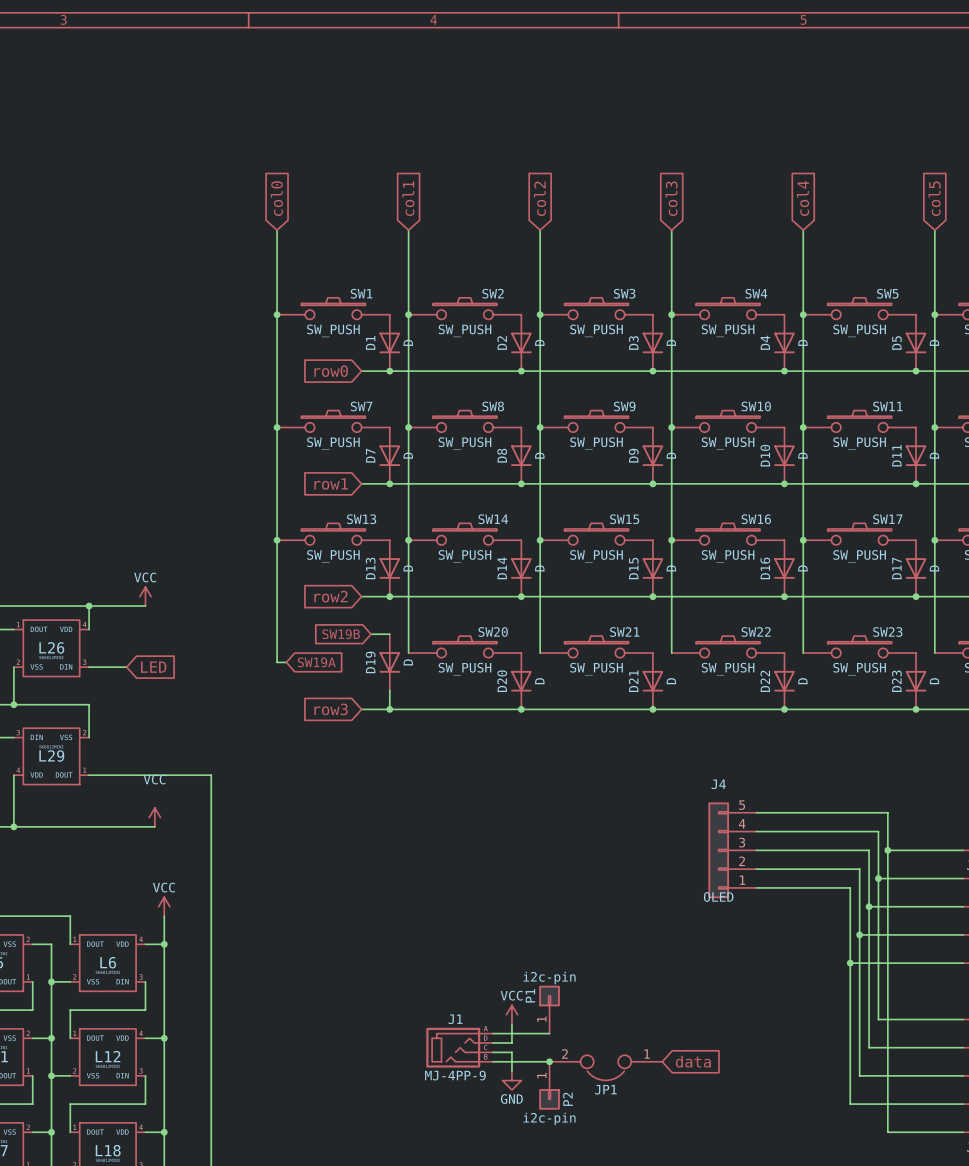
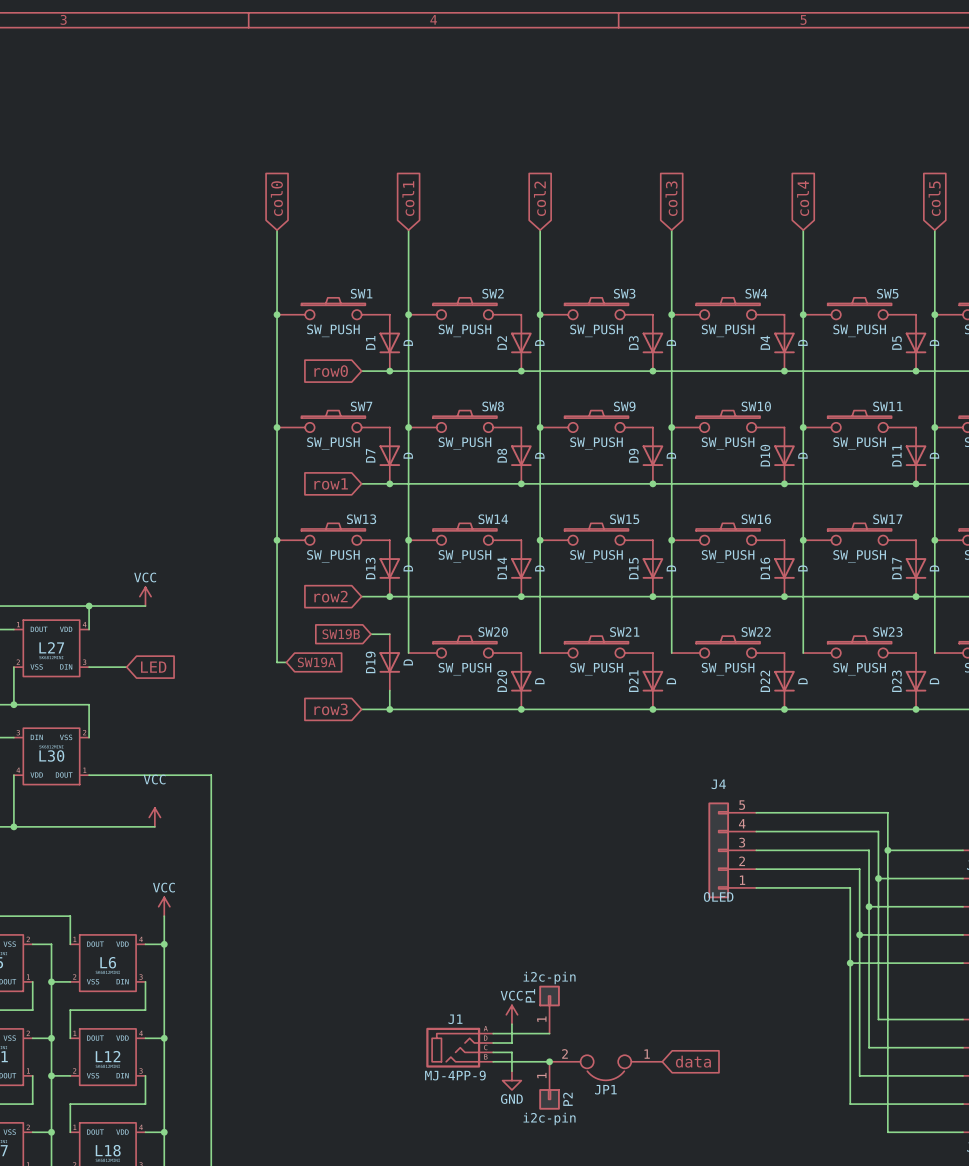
L26 name: L26 (51, 647) -> L27 (51, 647)
L29 name: L29 (51, 755) -> L30 (51, 755)

